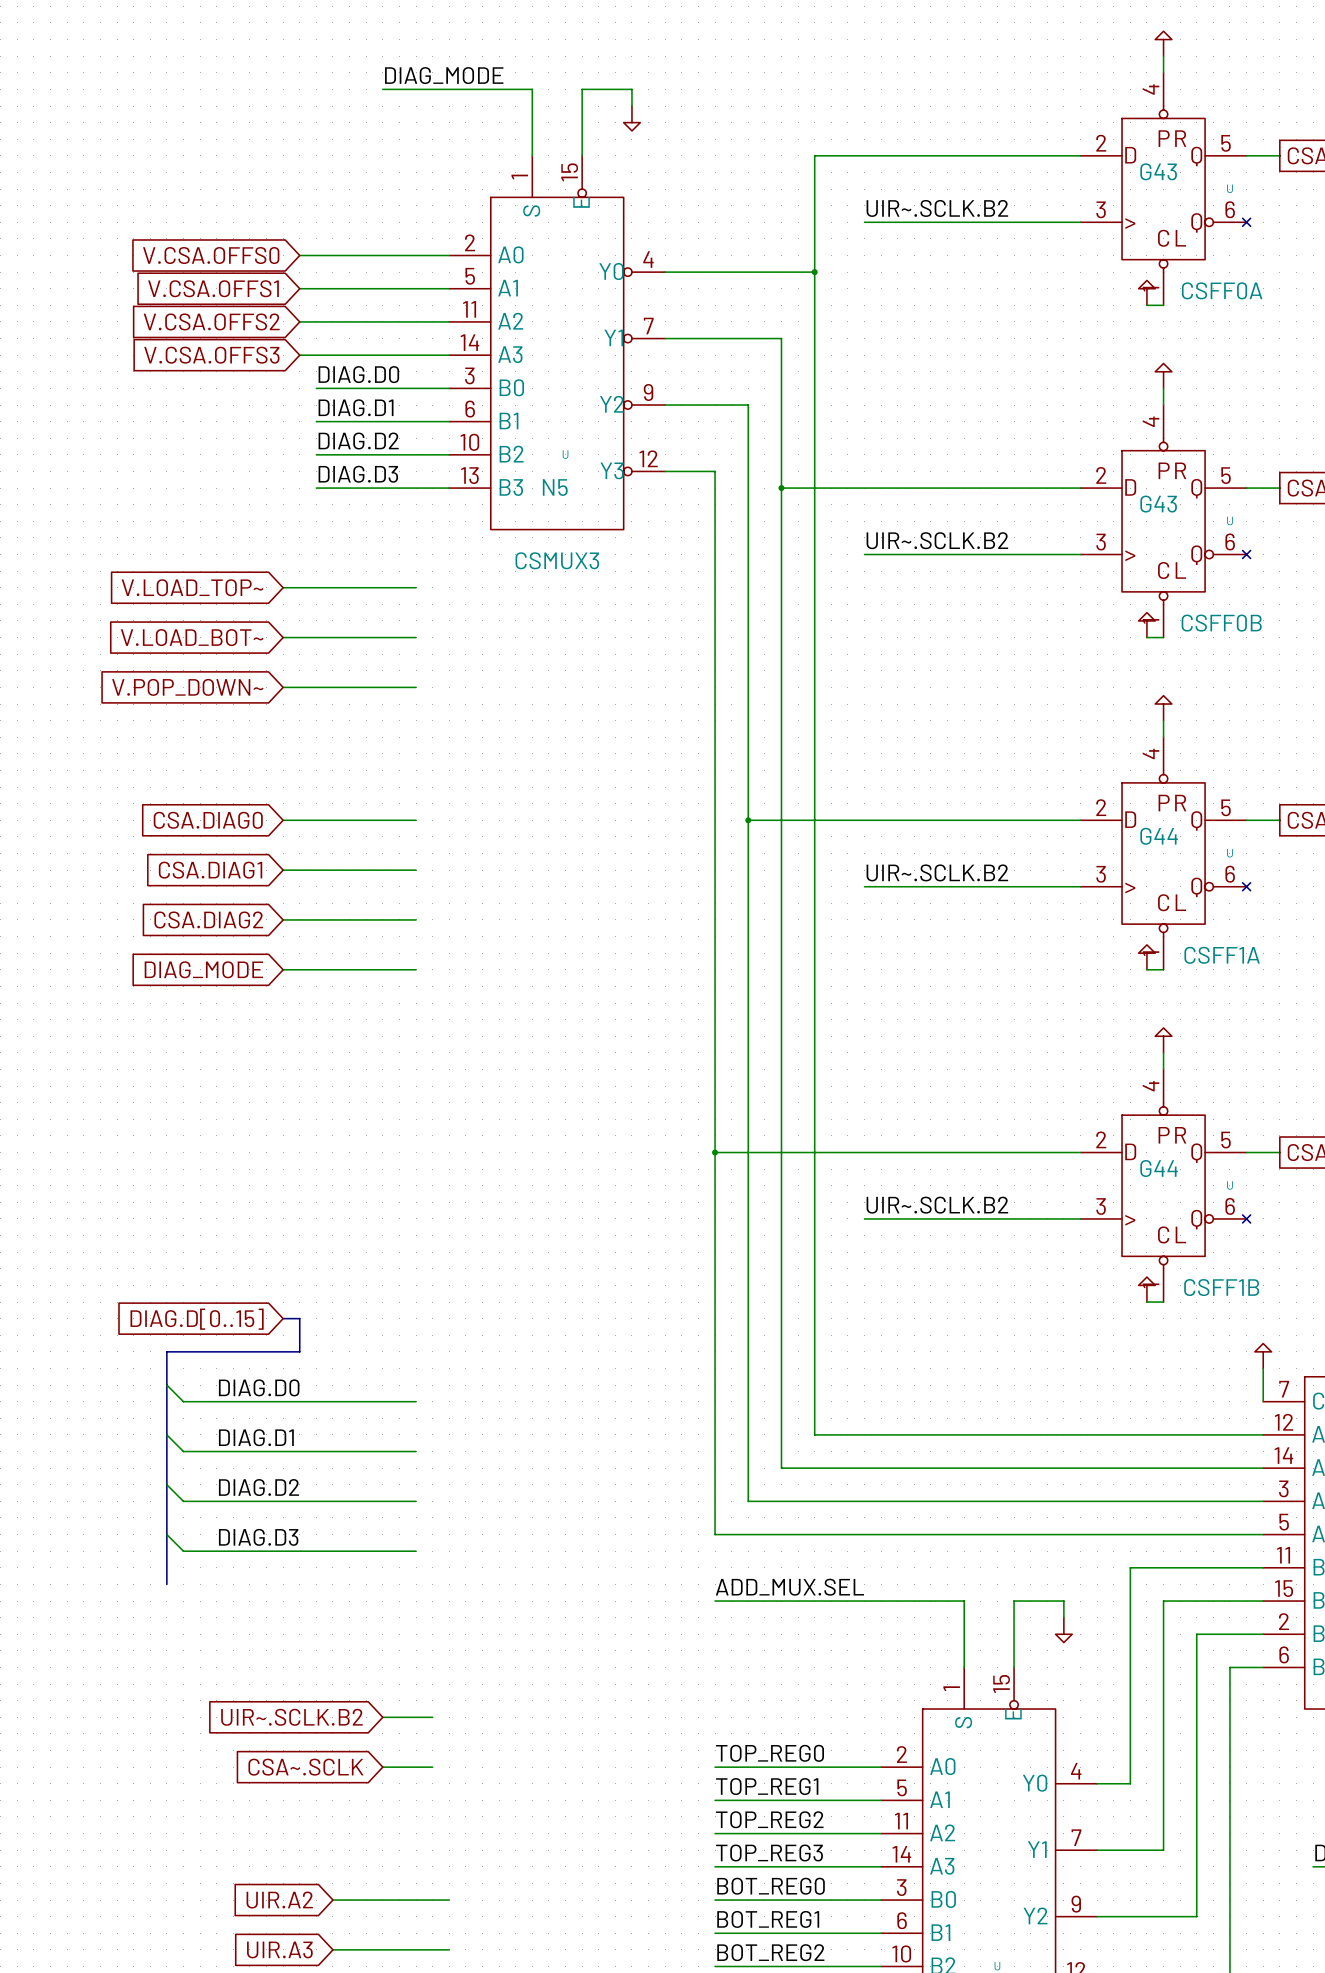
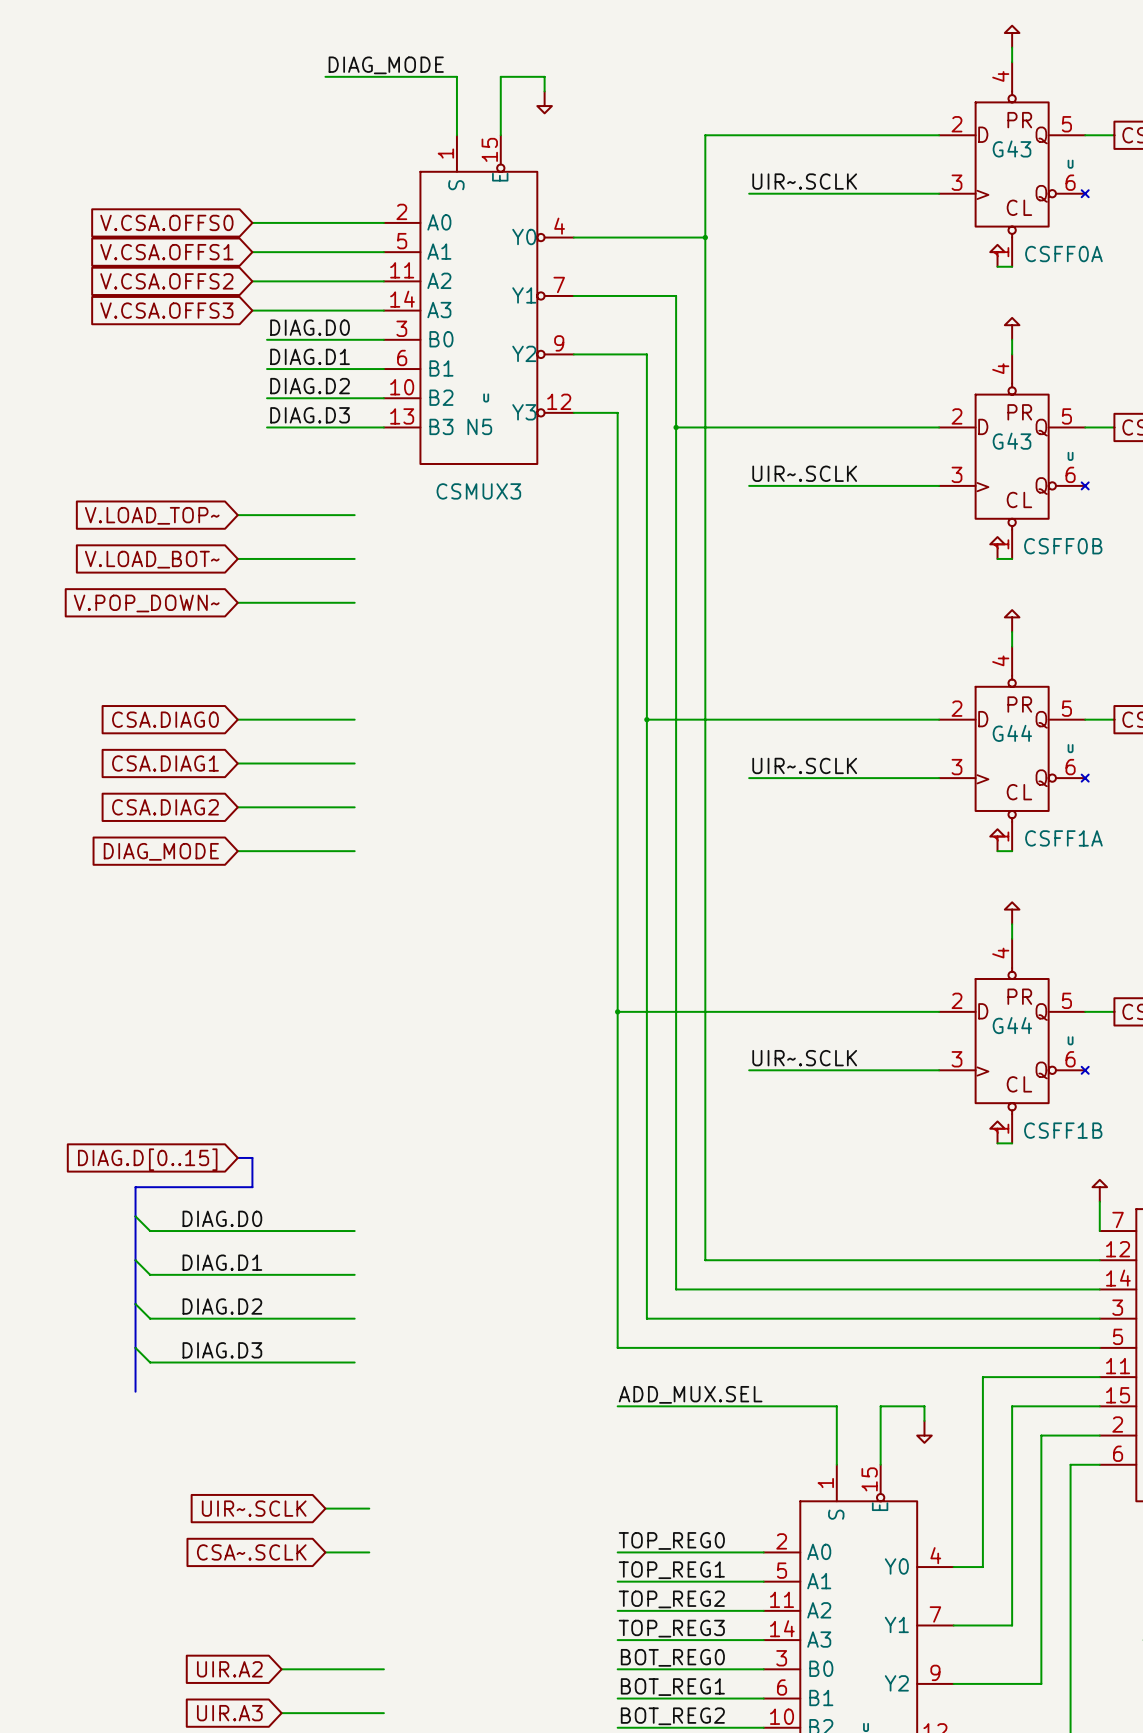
label: UIR~.SCLK.B2 (937, 208) -> UIR~.SCLK (804, 181)
label: UIR~.SCLK.B2 (937, 540) -> UIR~.SCLK (804, 473)
label: UIR~.SCLK.B2 (937, 872) -> UIR~.SCLK (804, 765)
label: UIR~.SCLK.B2 (937, 1205) -> UIR~.SCLK (804, 1058)
global label: UIR~.SCLK.B2 (291, 1717) -> UIR~.SCLK (254, 1508)

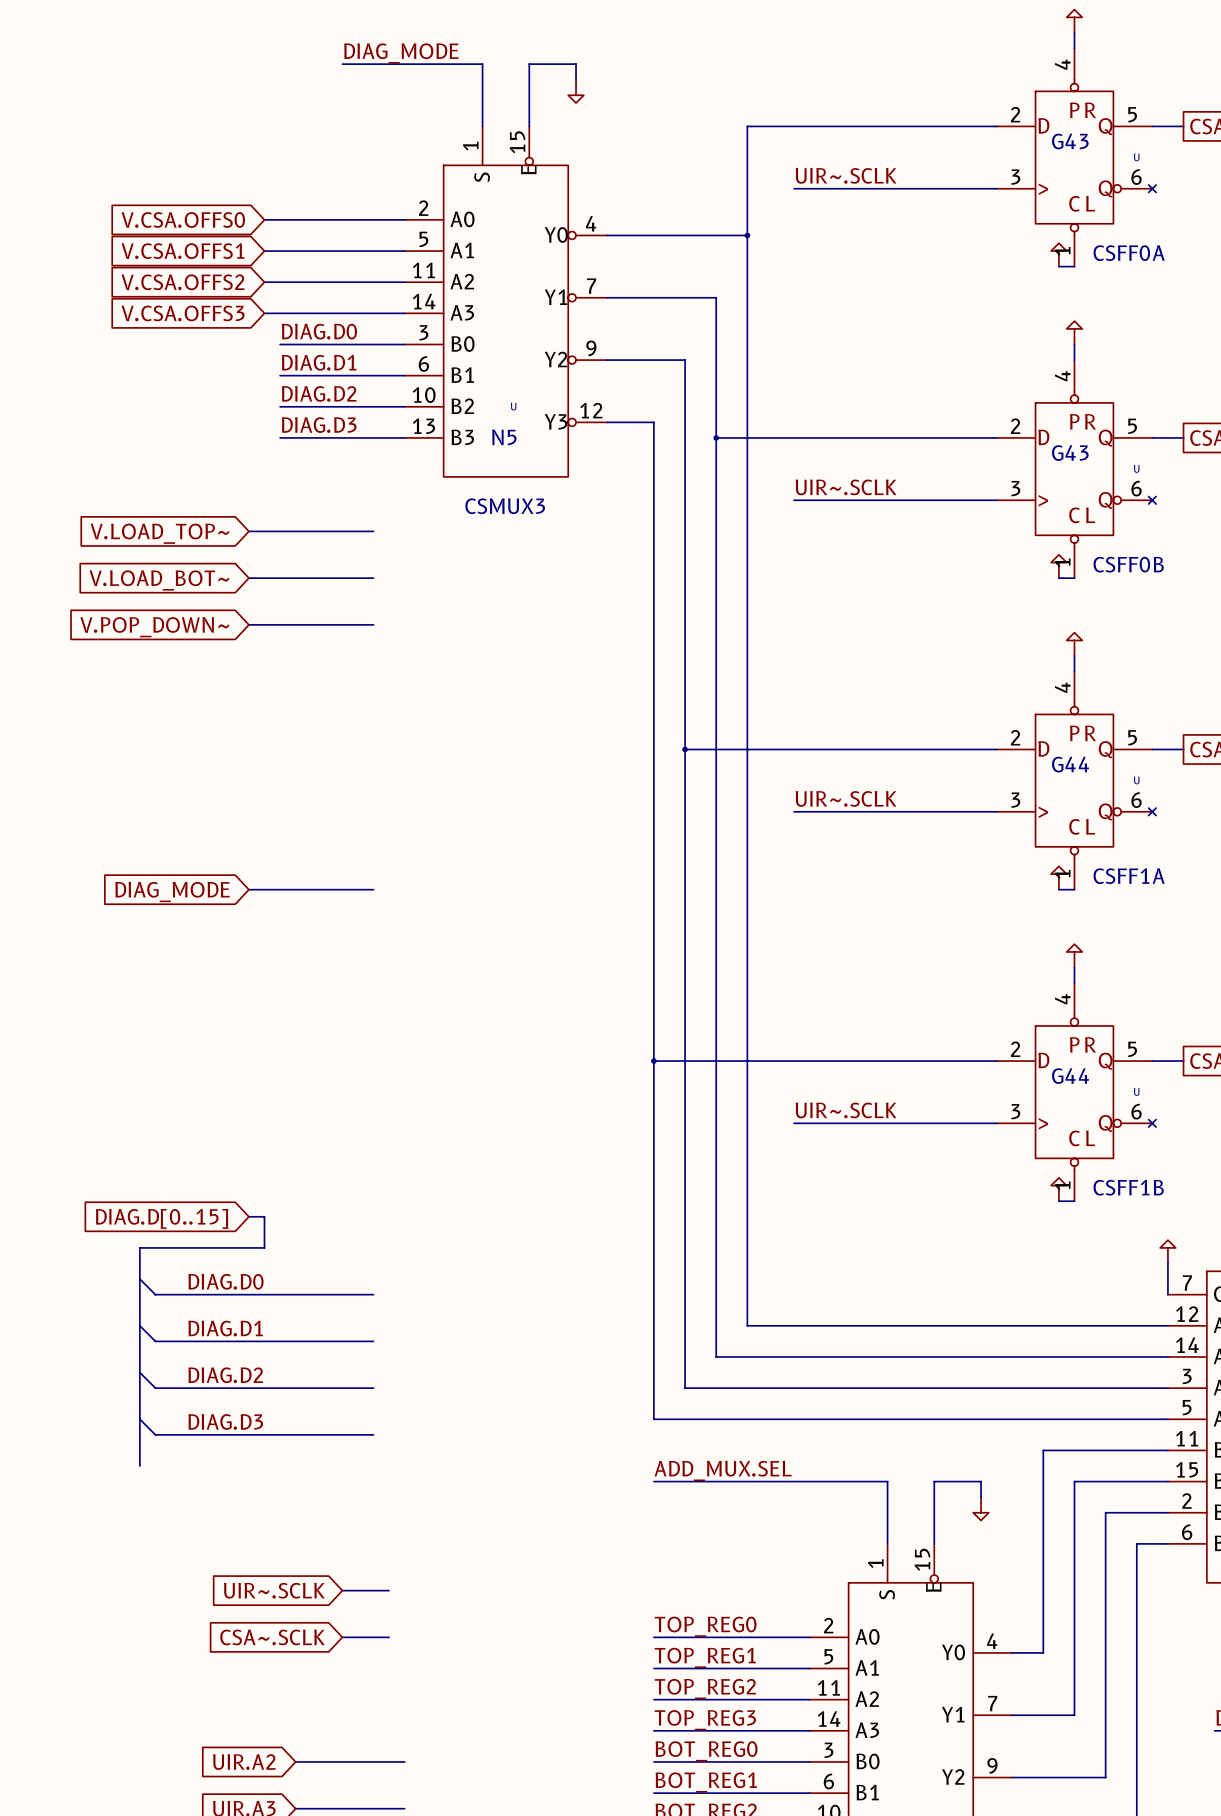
global label: CSA.DIAG0 (165, 719) -> none
wire: (237, 719) (354, 719) -> none
global label: CSA.DIAG1 (165, 763) -> none
wire: (237, 763) (354, 763) -> none
global label: CSA.DIAG2 (165, 807) -> none
wire: (237, 807) (354, 807) -> none

